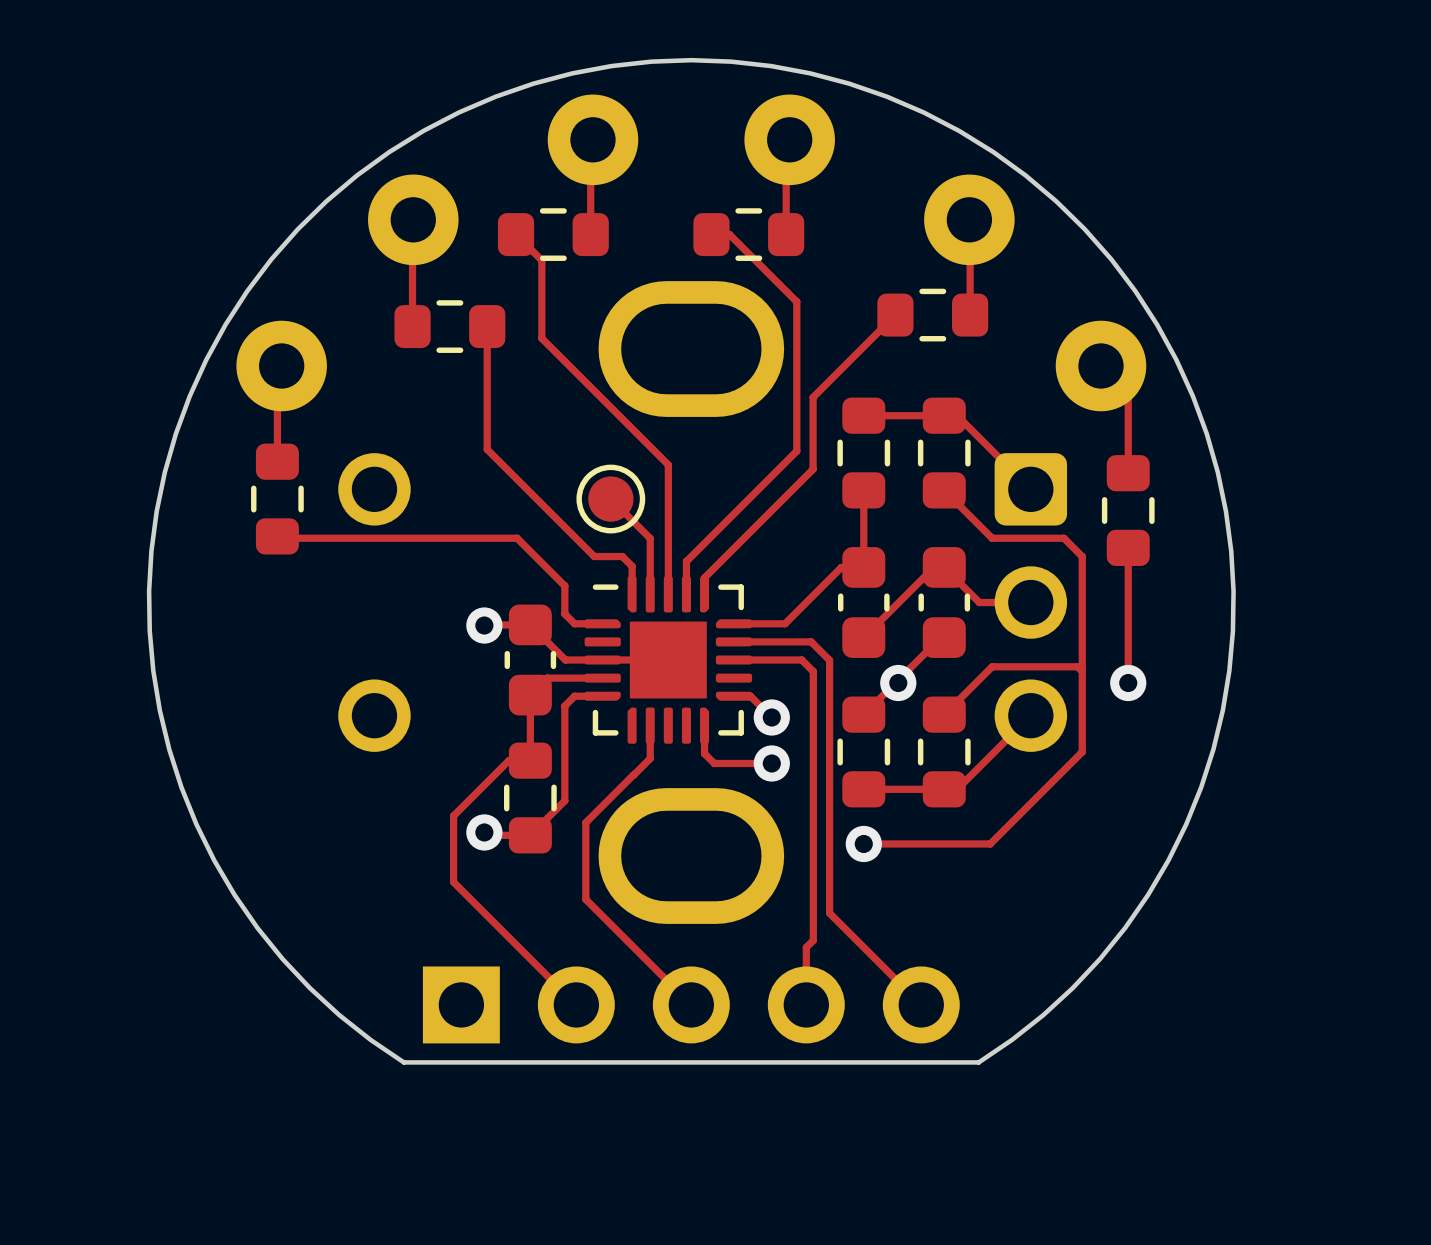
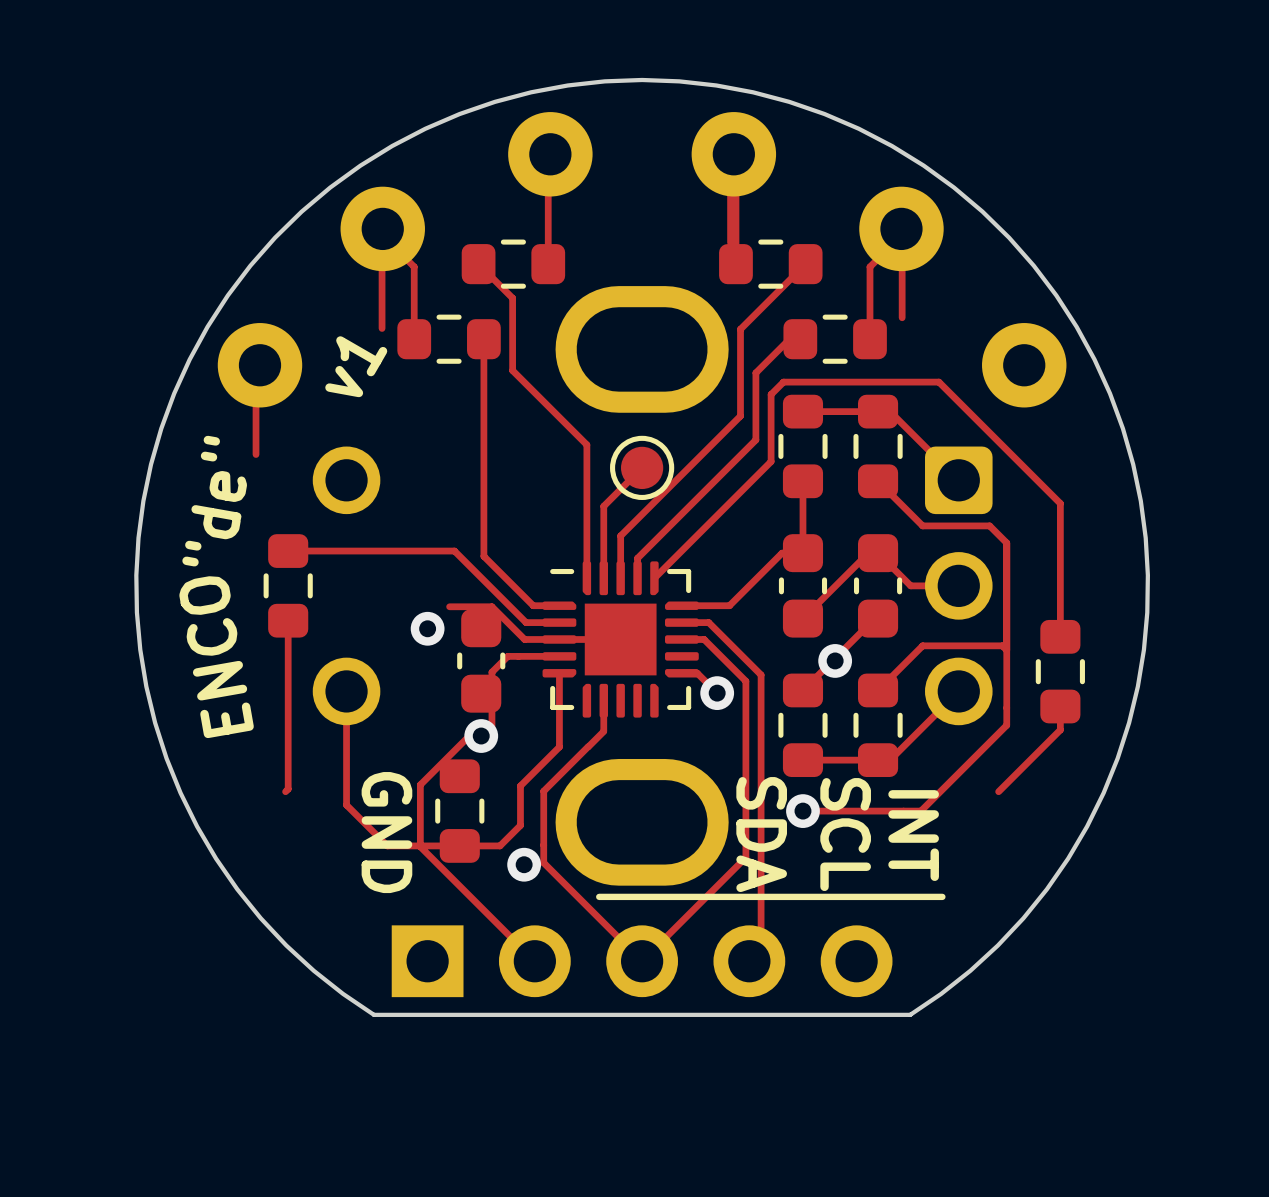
track: none -> (727, 183) (735, 191) (735, 264)
track: (516, 234) (541, 260) (541, 338) (668, 464) (668, 548) -> none
part position: (553, 234) -> (513, 264)
track: (711, 234) (729, 234) (796, 301) (796, 327) -> (805, 264) (740, 329)
part position: (748, 234) -> (770, 264)
track: none -> (400, 252) (414, 266) (414, 339)
track: none -> (884, 252) (869, 266) (869, 339)
track: (895, 315) (813, 397) -> (800, 339) (789, 339) (755, 372) (755, 394)
part position: (932, 315) -> (835, 339)
part position: (449, 326) -> (449, 339)
track: (487, 326) (487, 449) (594, 556) (622, 556) (632, 566) -> (478, 264) (512, 298) (512, 370) (586, 444) (586, 552)
track: (1100, 366) (1128, 393) (1128, 473) -> none
text: none -> v1 (356, 366)
track: (796, 420) (796, 451) (686, 561) (686, 572) -> (740, 416) (620, 535)
track: (813, 446) (813, 469) (704, 577) (704, 594) -> (755, 439) (637, 558)
part position: (277, 499) -> (288, 585)
track: (610, 499) (650, 538) -> (642, 467) (603, 506) (603, 526)
part position: (610, 499) -> (642, 467)
part position: (1128, 510) -> (1060, 671)
text: none -> "de" (214, 501)
track: (277, 536) (279, 538) (517, 538) (564, 585) (564, 614) -> (483, 339) (483, 556) (524, 596)
track: (1128, 547) (1128, 683) -> none
track: none -> (288, 551) (454, 551) (526, 622) (559, 622)
track: none -> (654, 578) (771, 461) (771, 394) (783, 382) (938, 382) (1060, 503) (1060, 636)
via position: (484, 625) -> (427, 628)
track: none -> (288, 620) (288, 789) (285, 791)
track: (762, 641) (811, 641) (829, 660) (829, 913) (921, 1004) -> none
part position: (530, 660) -> (481, 660)
track: (757, 660) (801, 660) (813, 671) (813, 940) (806, 947) (806, 1004) -> (708, 622) (761, 674) (761, 949) (749, 961)
track: none -> (704, 639) (745, 681) (745, 857) (642, 961)
text: none -> ENCO (216, 657)
via: (1128, 683) -> none
track: (602, 696) (574, 696) (564, 705) (564, 800) (530, 835) (487, 835) (484, 832) -> (559, 673) (559, 747) (520, 785) (520, 825) (500, 845) (387, 845) (346, 805) (346, 691)
track: (704, 725) (704, 753) (714, 763) (771, 763) -> none
track: none -> (1060, 706) (1060, 729) (998, 791)
via: none -> (481, 736)
via: (771, 763) -> none
part position: (530, 797) -> (459, 811)
via: (484, 832) -> none
text: none -> GND (386, 832)
text: none -> SDA (761, 834)
text: none -> SCL (845, 834)
text: none -> INT (913, 835)
via: none -> (524, 864)
line: none -> (599, 896) (942, 896)

